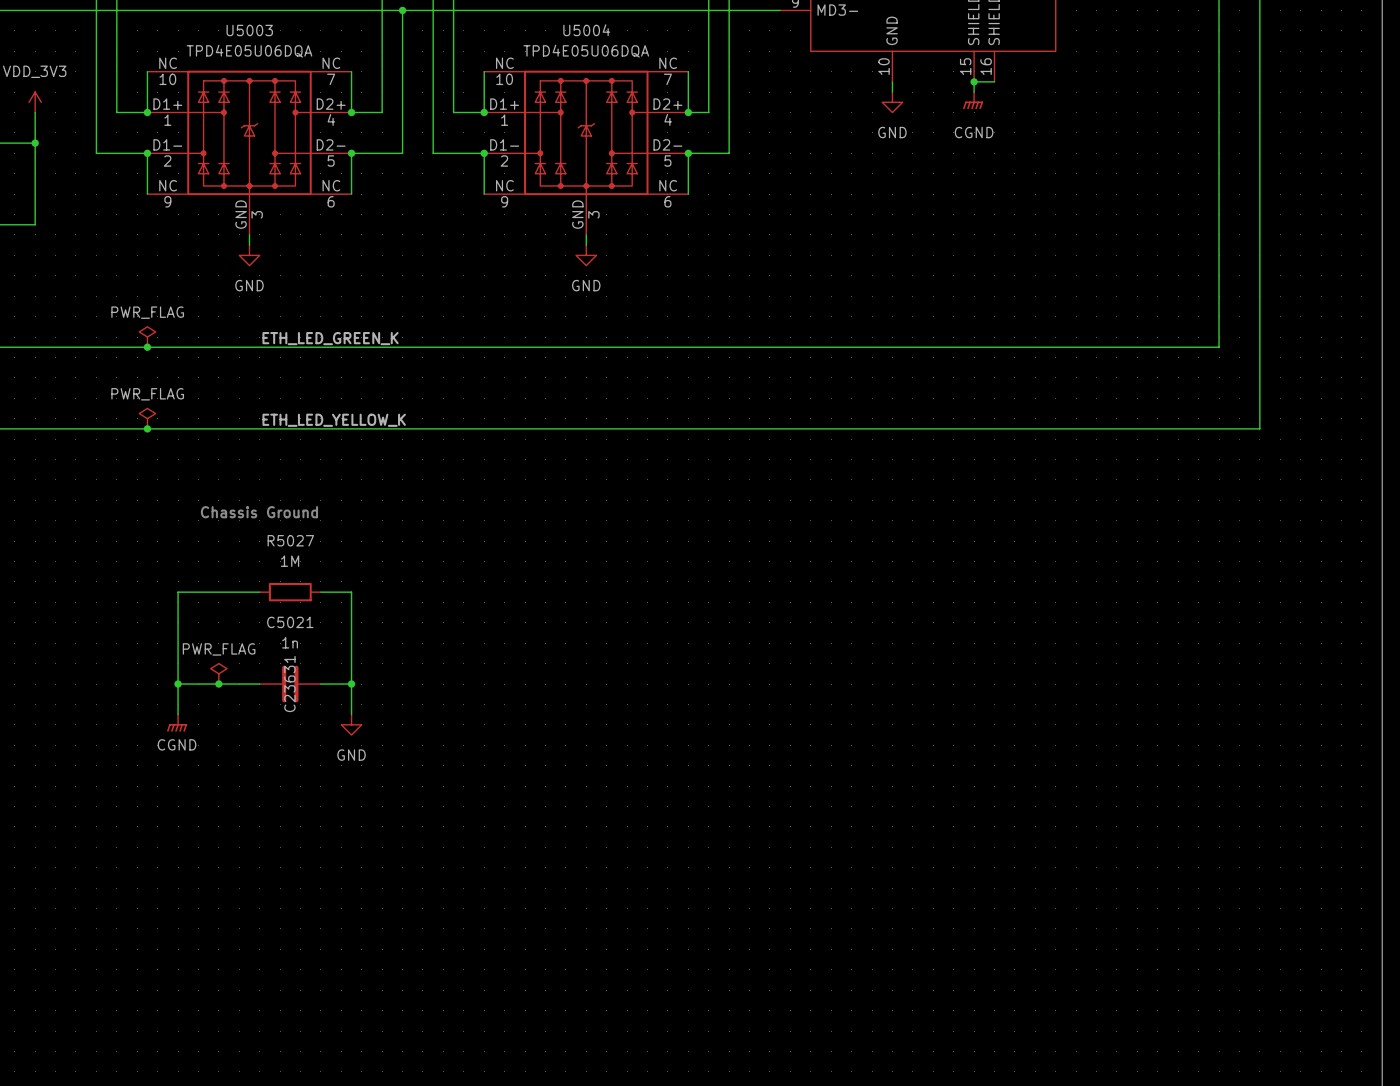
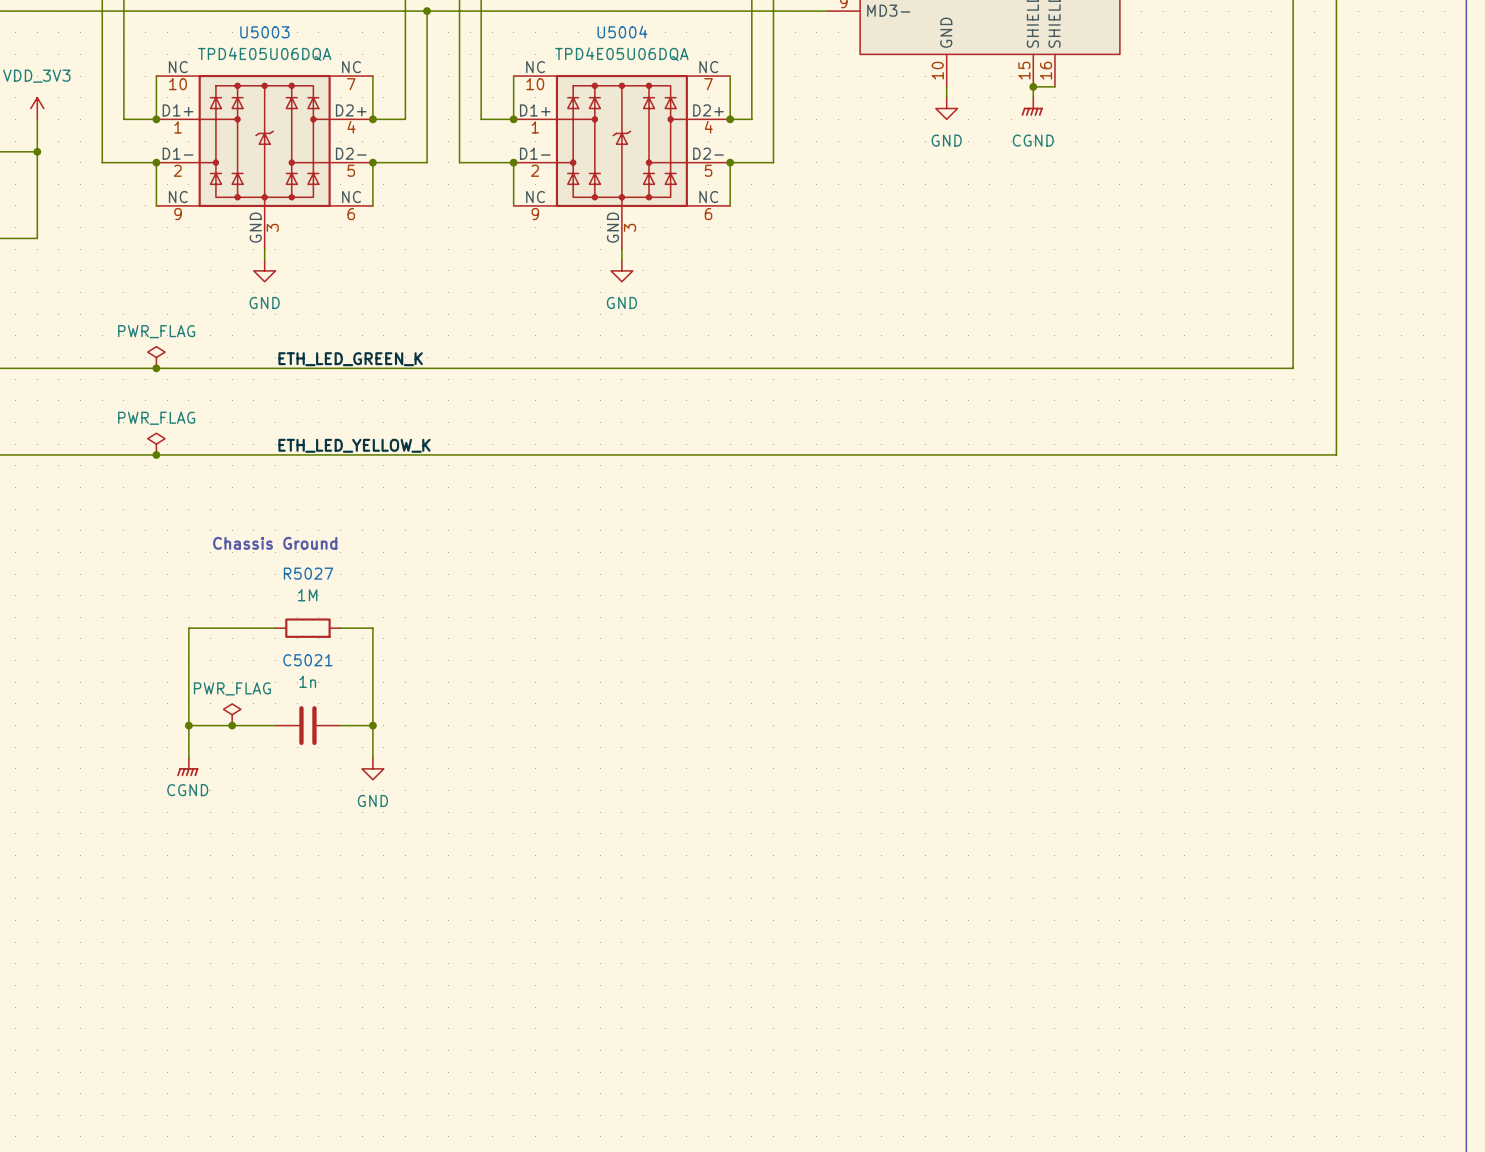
C5021 text: C23631 (289, 684) -> none

